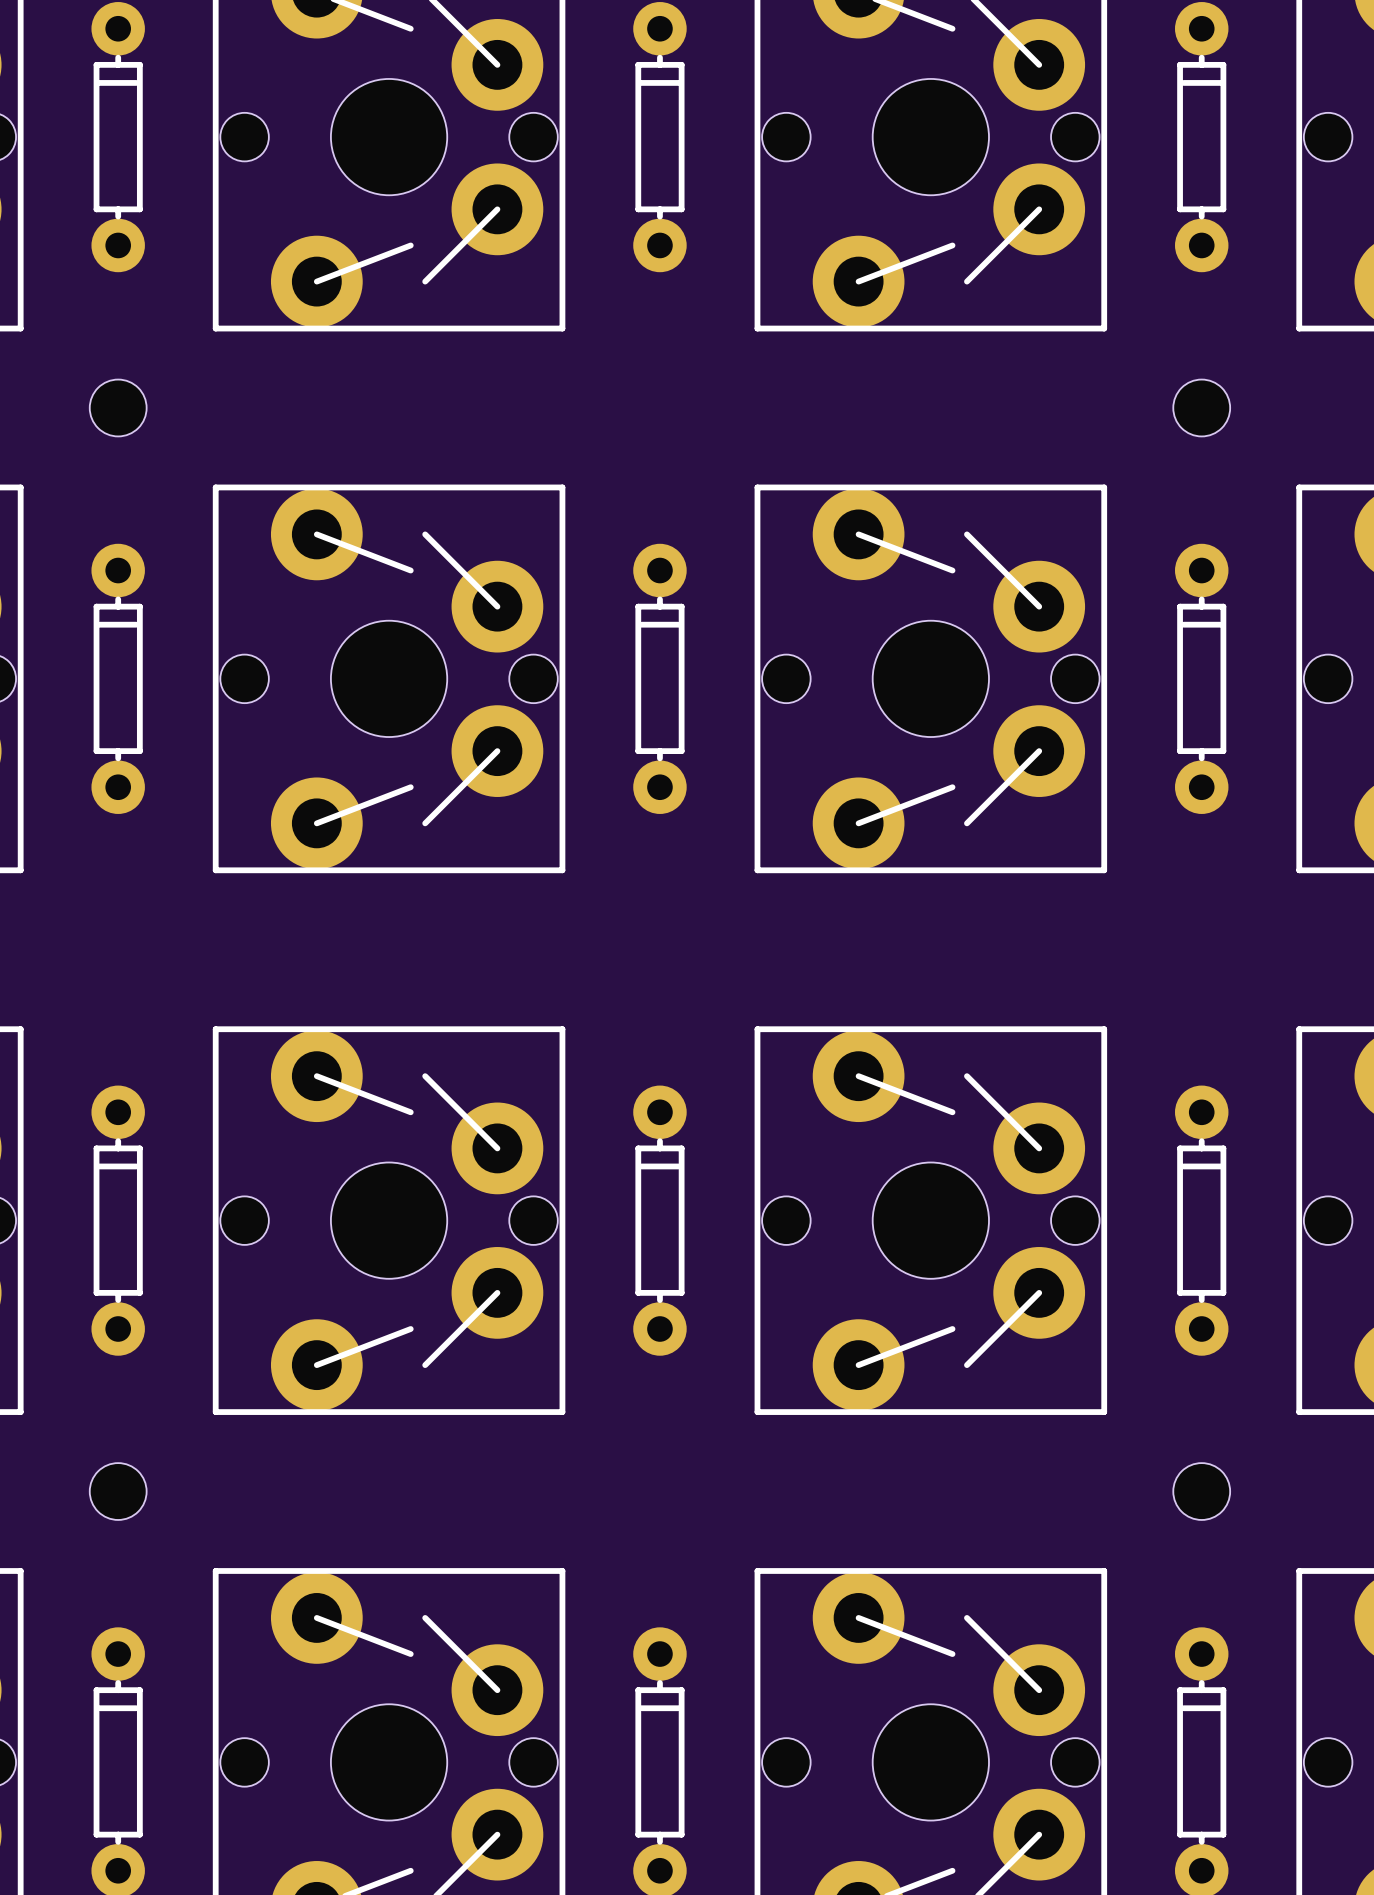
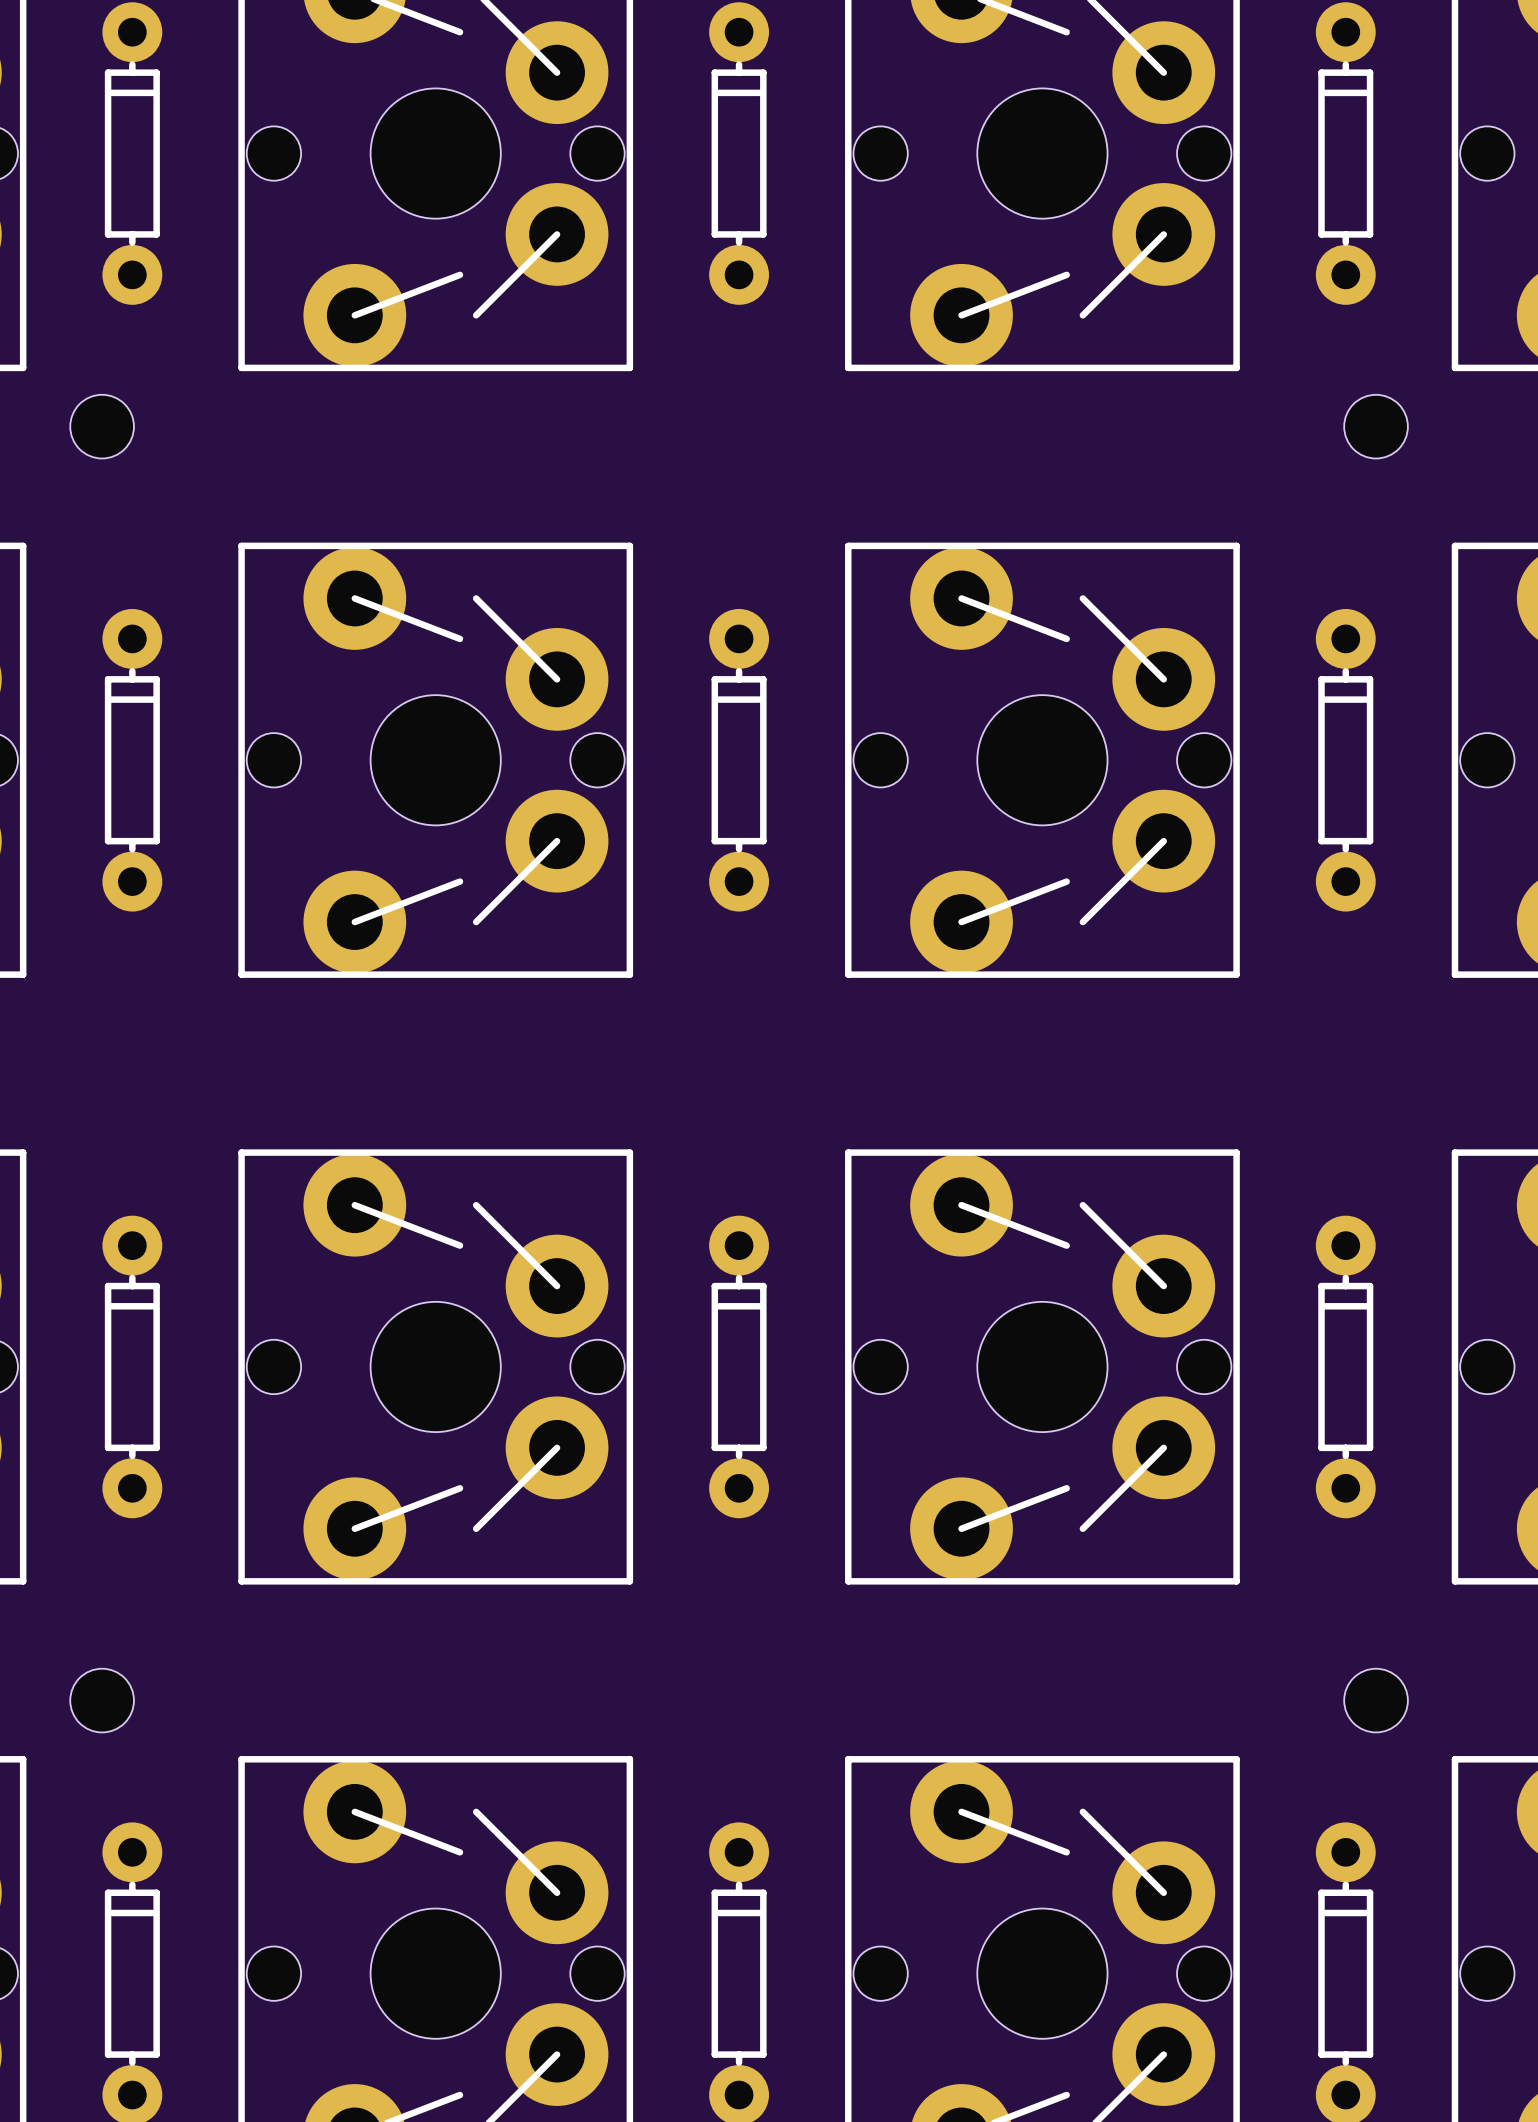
hole position: (118, 407) -> (102, 426)
hole position: (1201, 407) -> (1376, 426)
hole position: (118, 1491) -> (102, 1700)
hole position: (1201, 1491) -> (1376, 1700)

